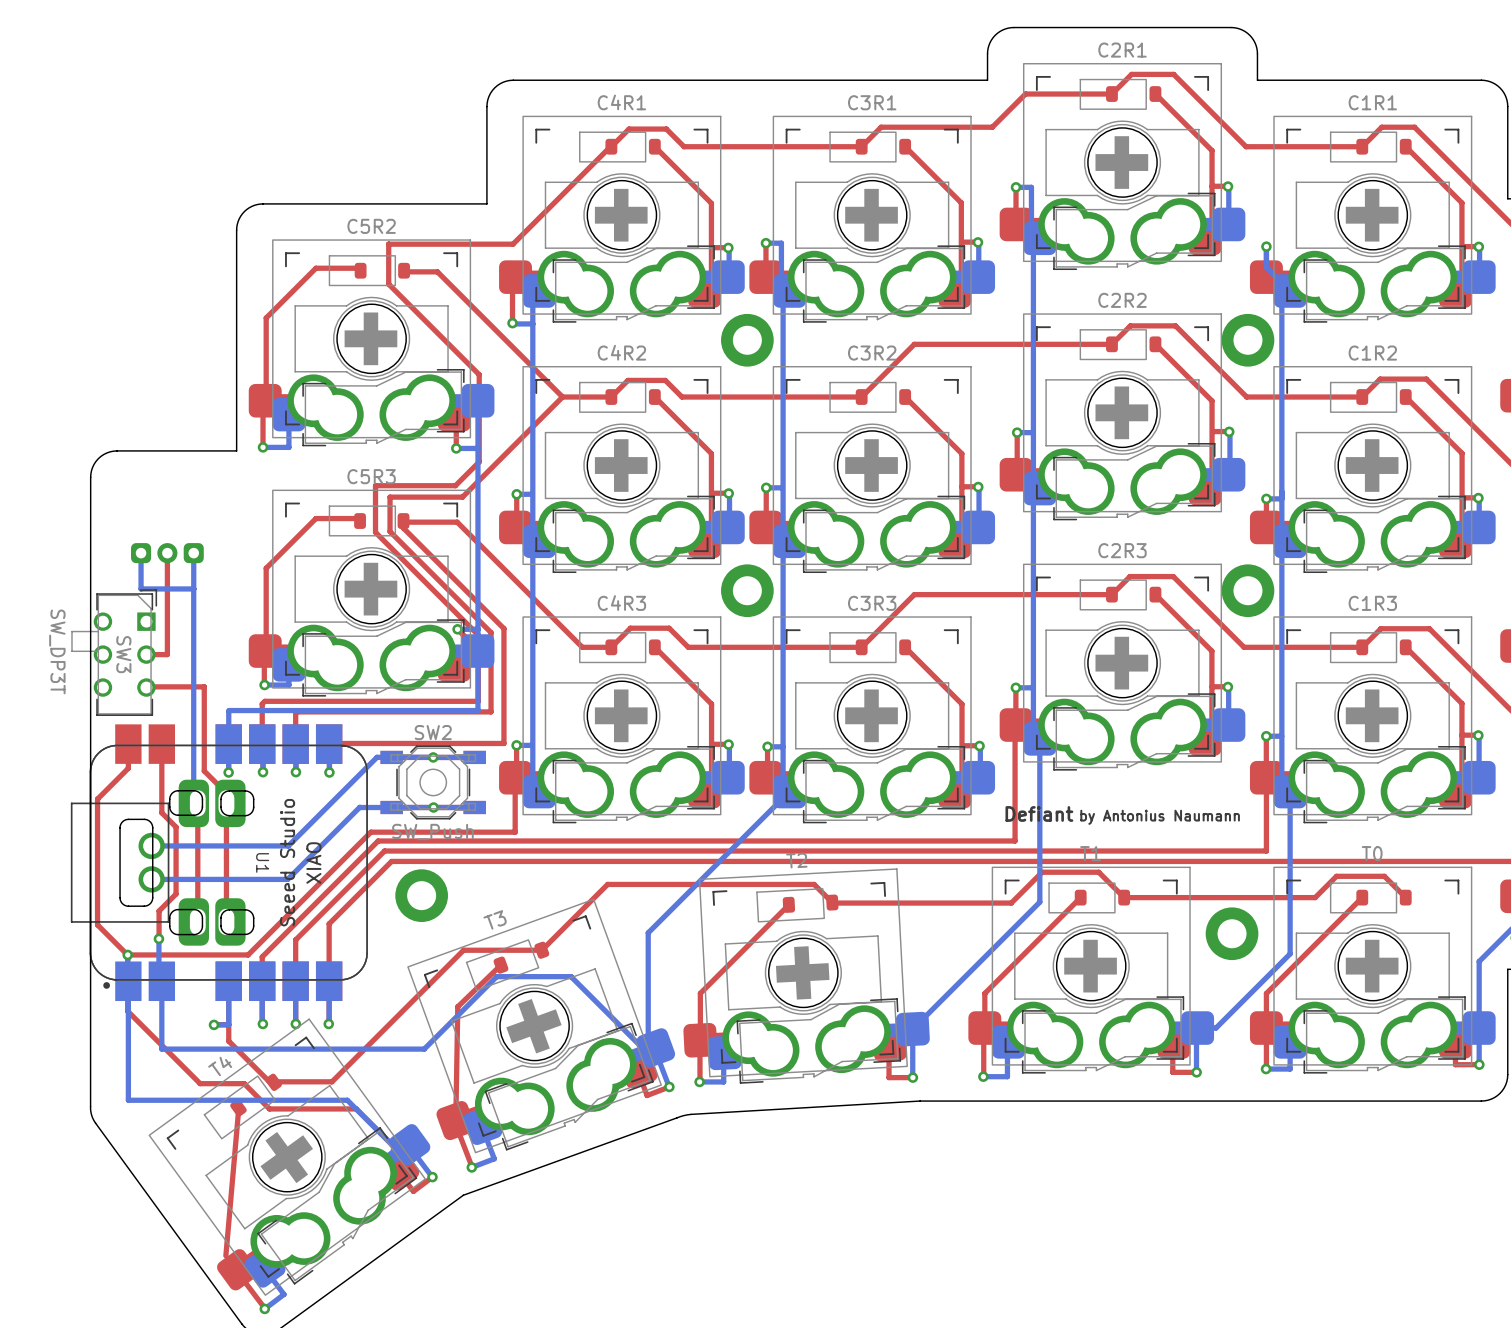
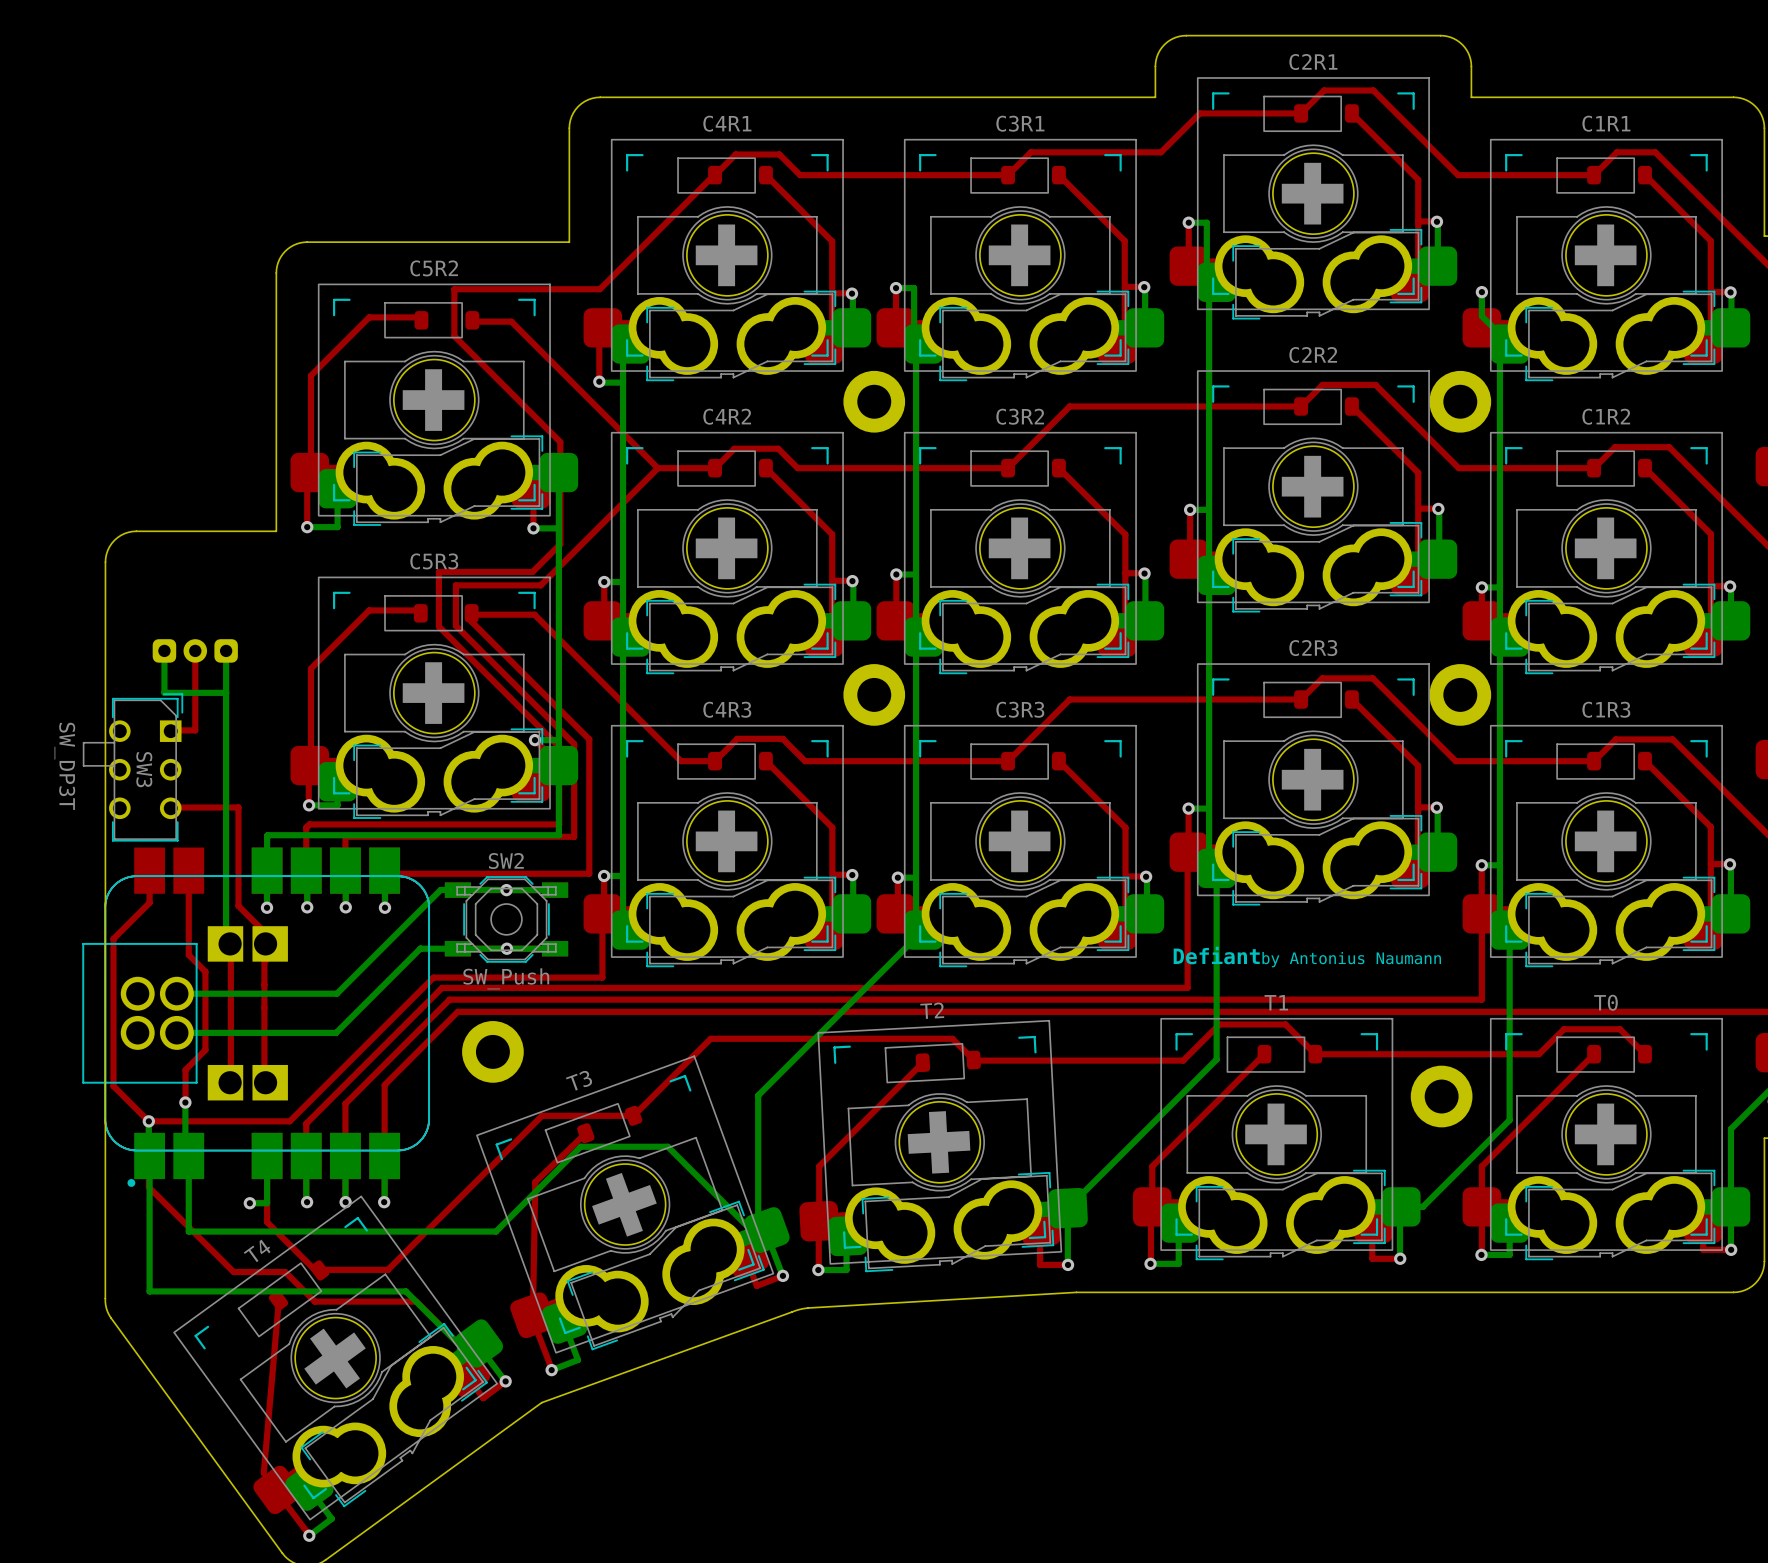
top track: (167, 621) (167, 654) -> (195, 730) (173, 730)
top track: (167, 654) (146, 654) -> none
U1: (219, 862) -> none
part: none -> (256, 1017)

